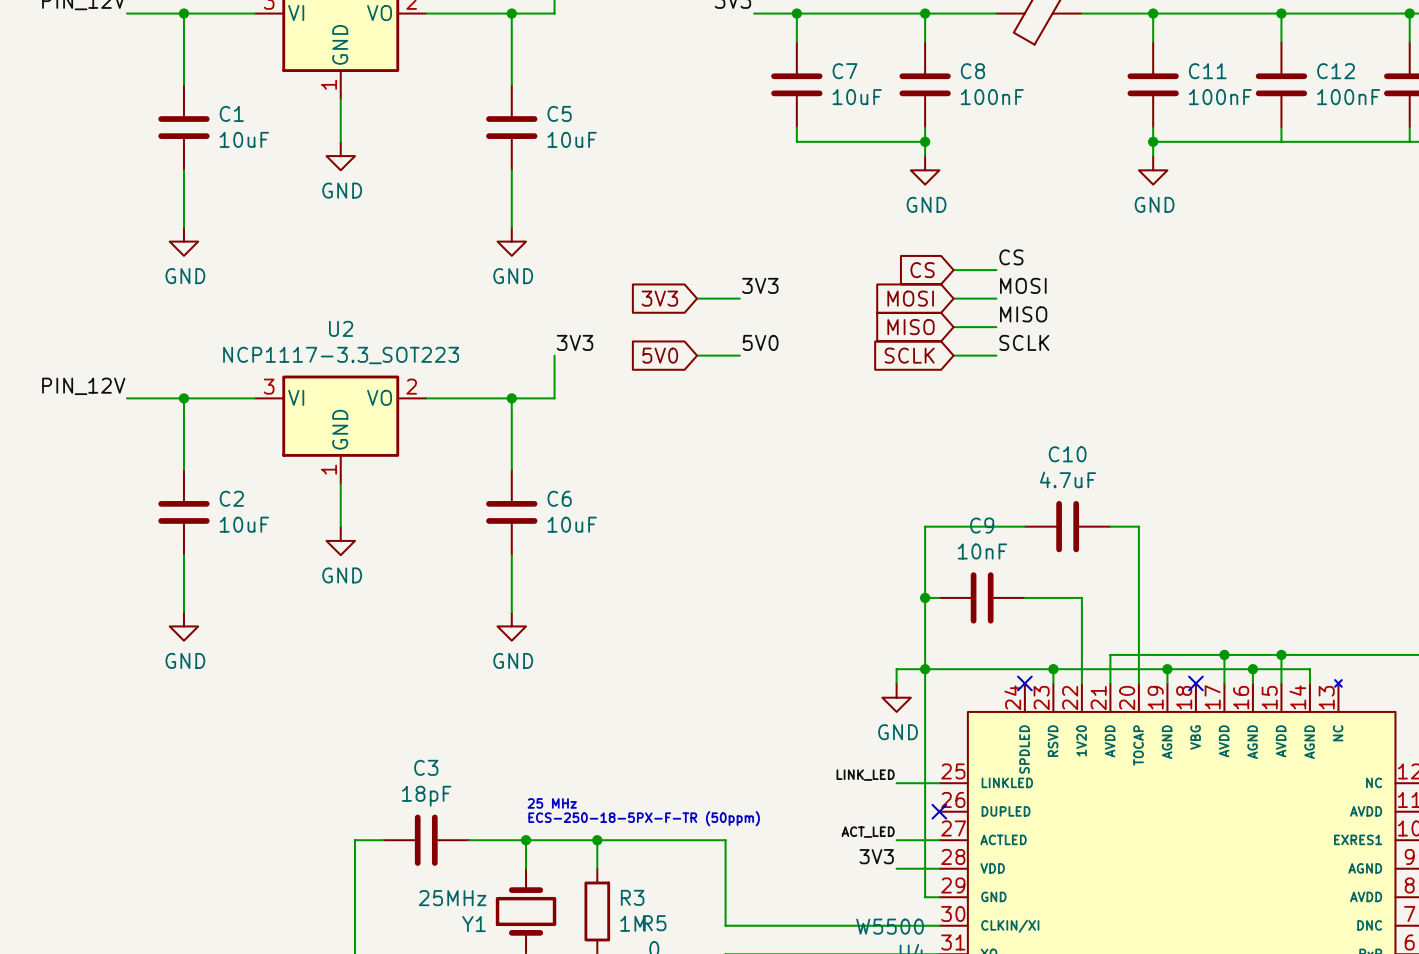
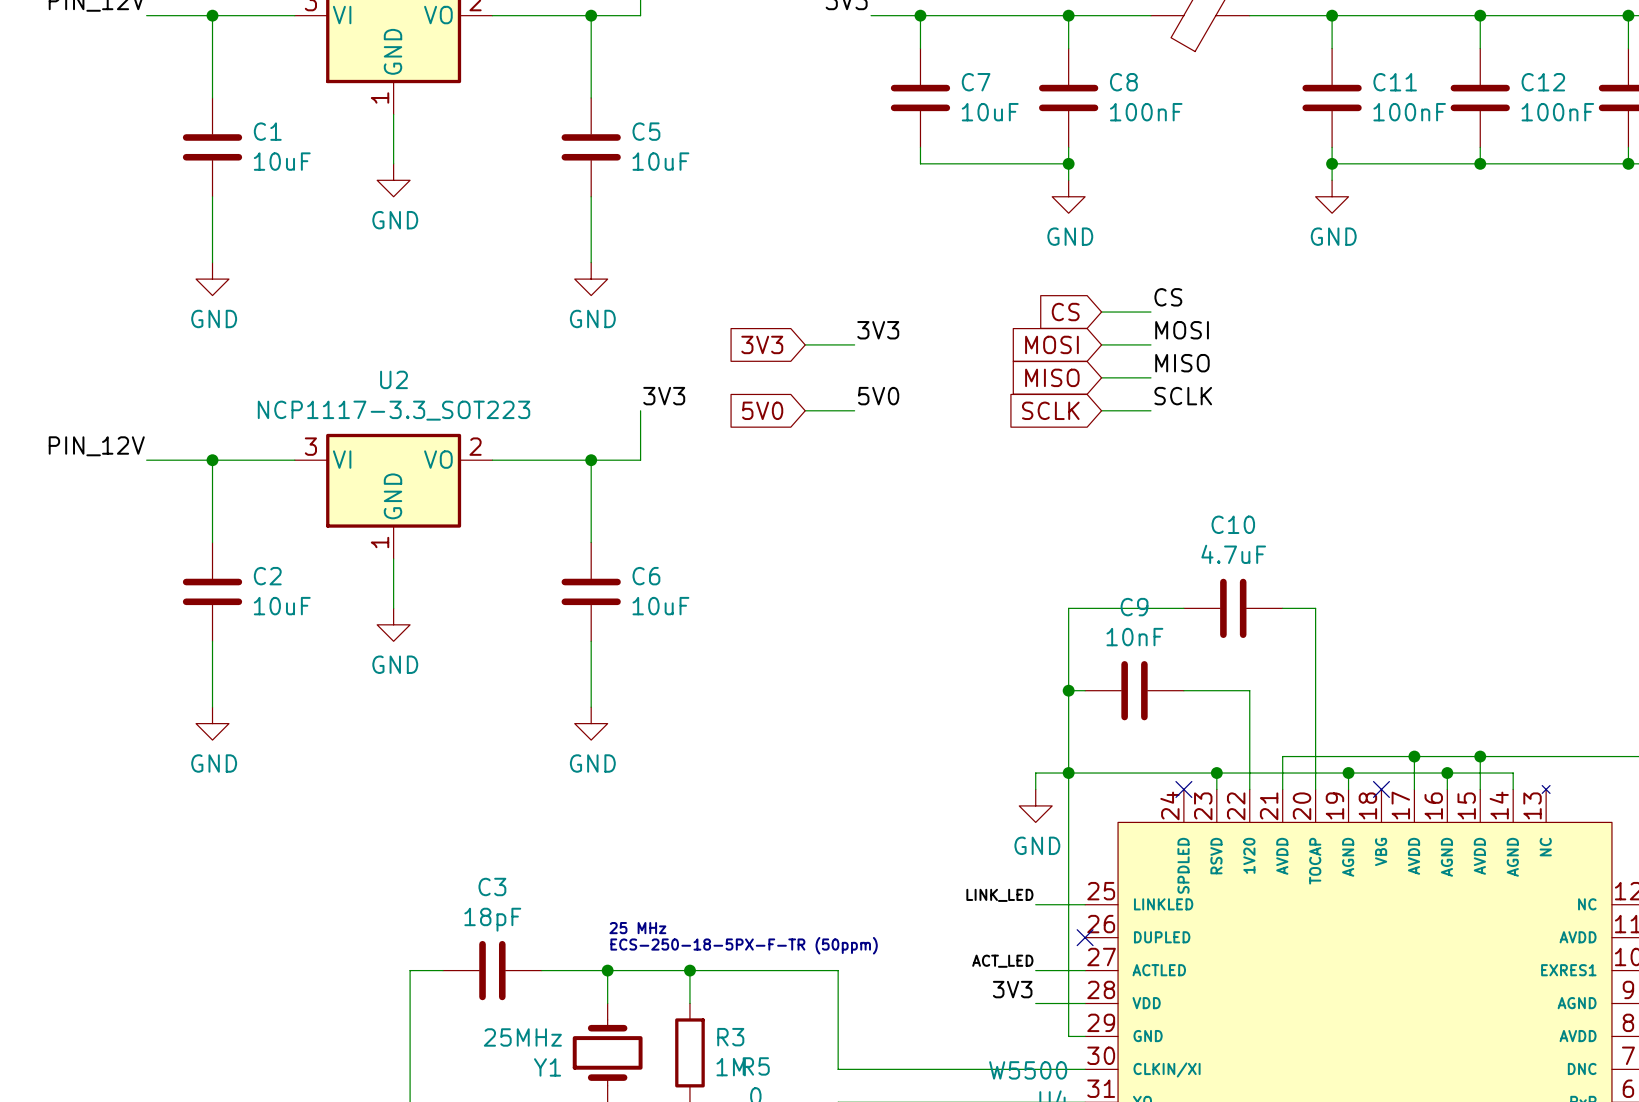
junction: none -> (1480, 163)
junction: none -> (1628, 163)

